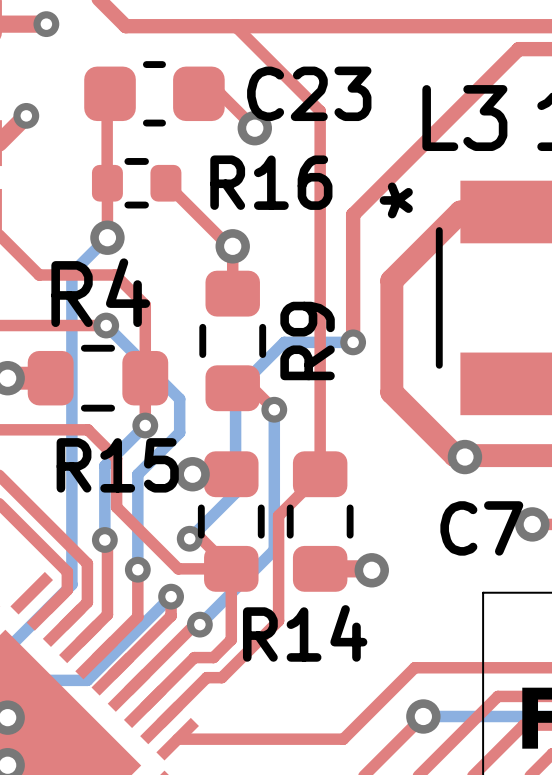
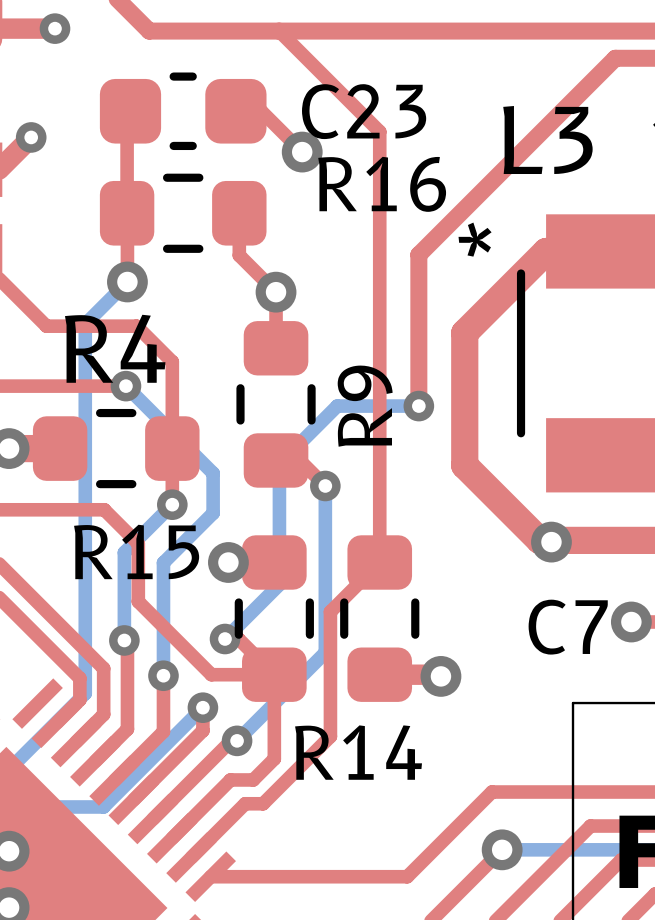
R16 footprint: [91, 158, 182, 209] -> [99, 173, 267, 253]
R16 name position: R16 (271, 182) -> R16 (382, 184)
top track: (165, 183) (229, 246) (232, 246) -> (239, 213) (239, 255) (276, 292)

